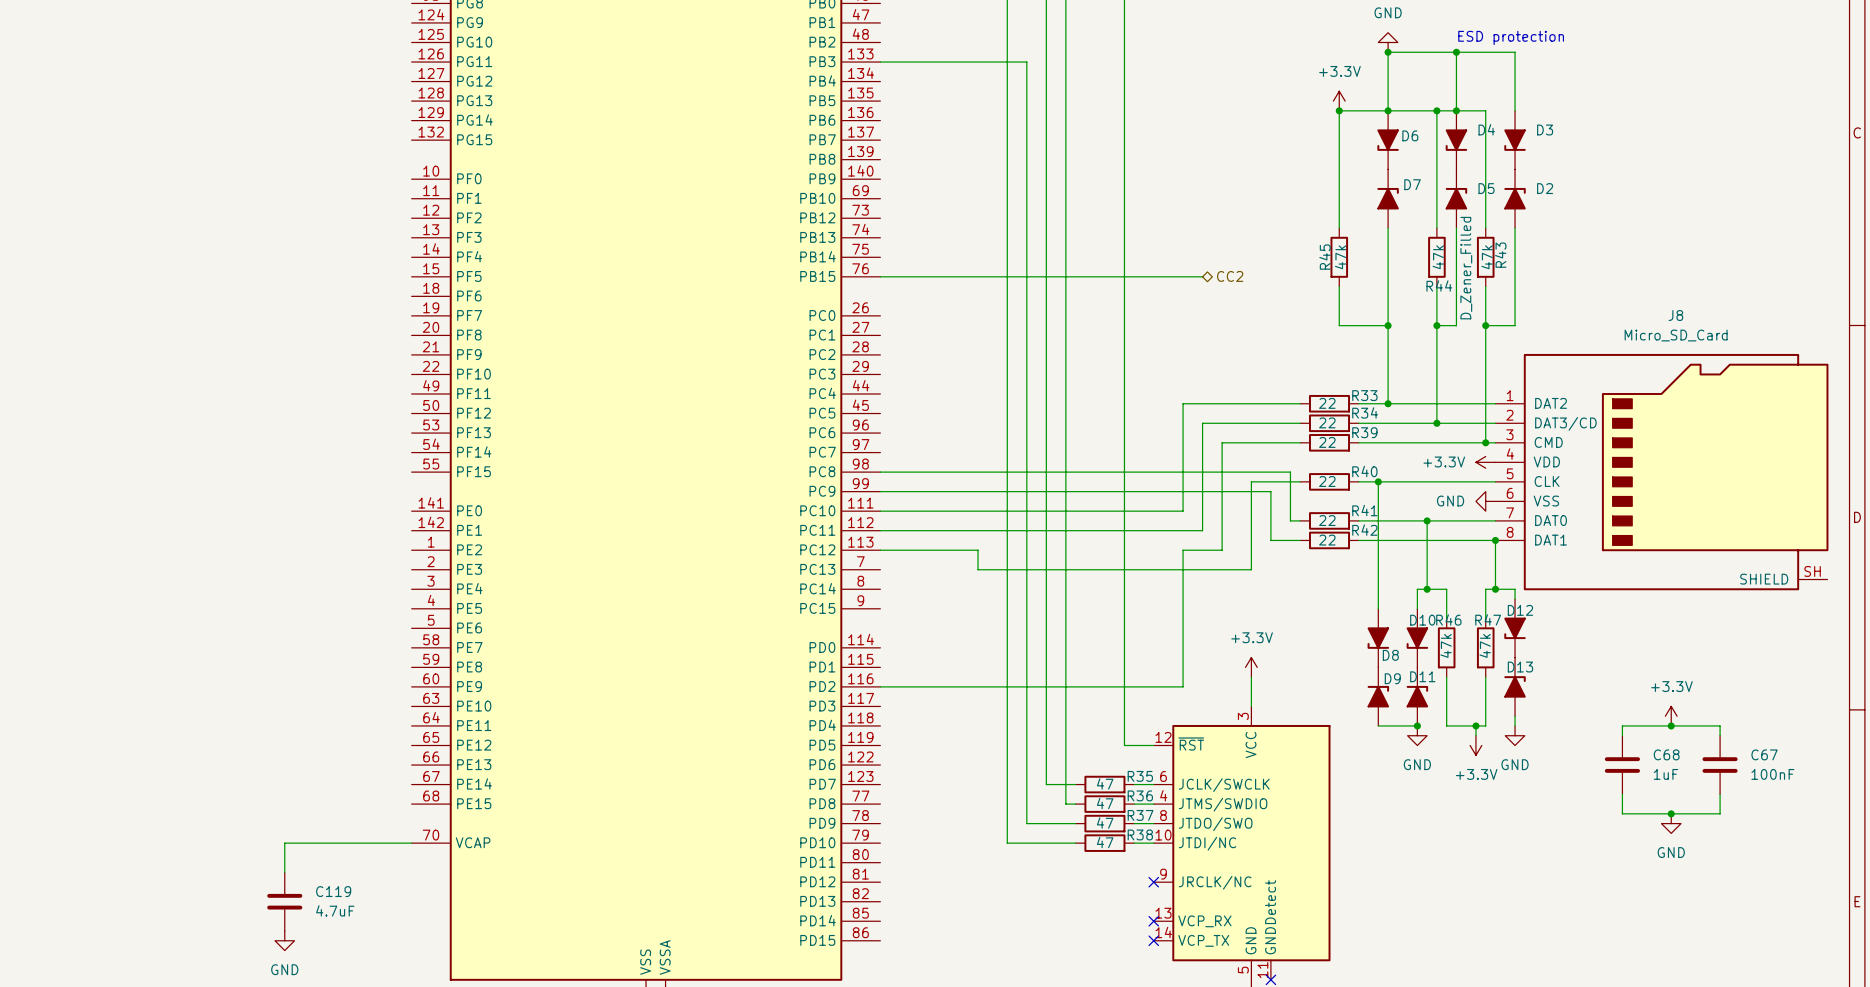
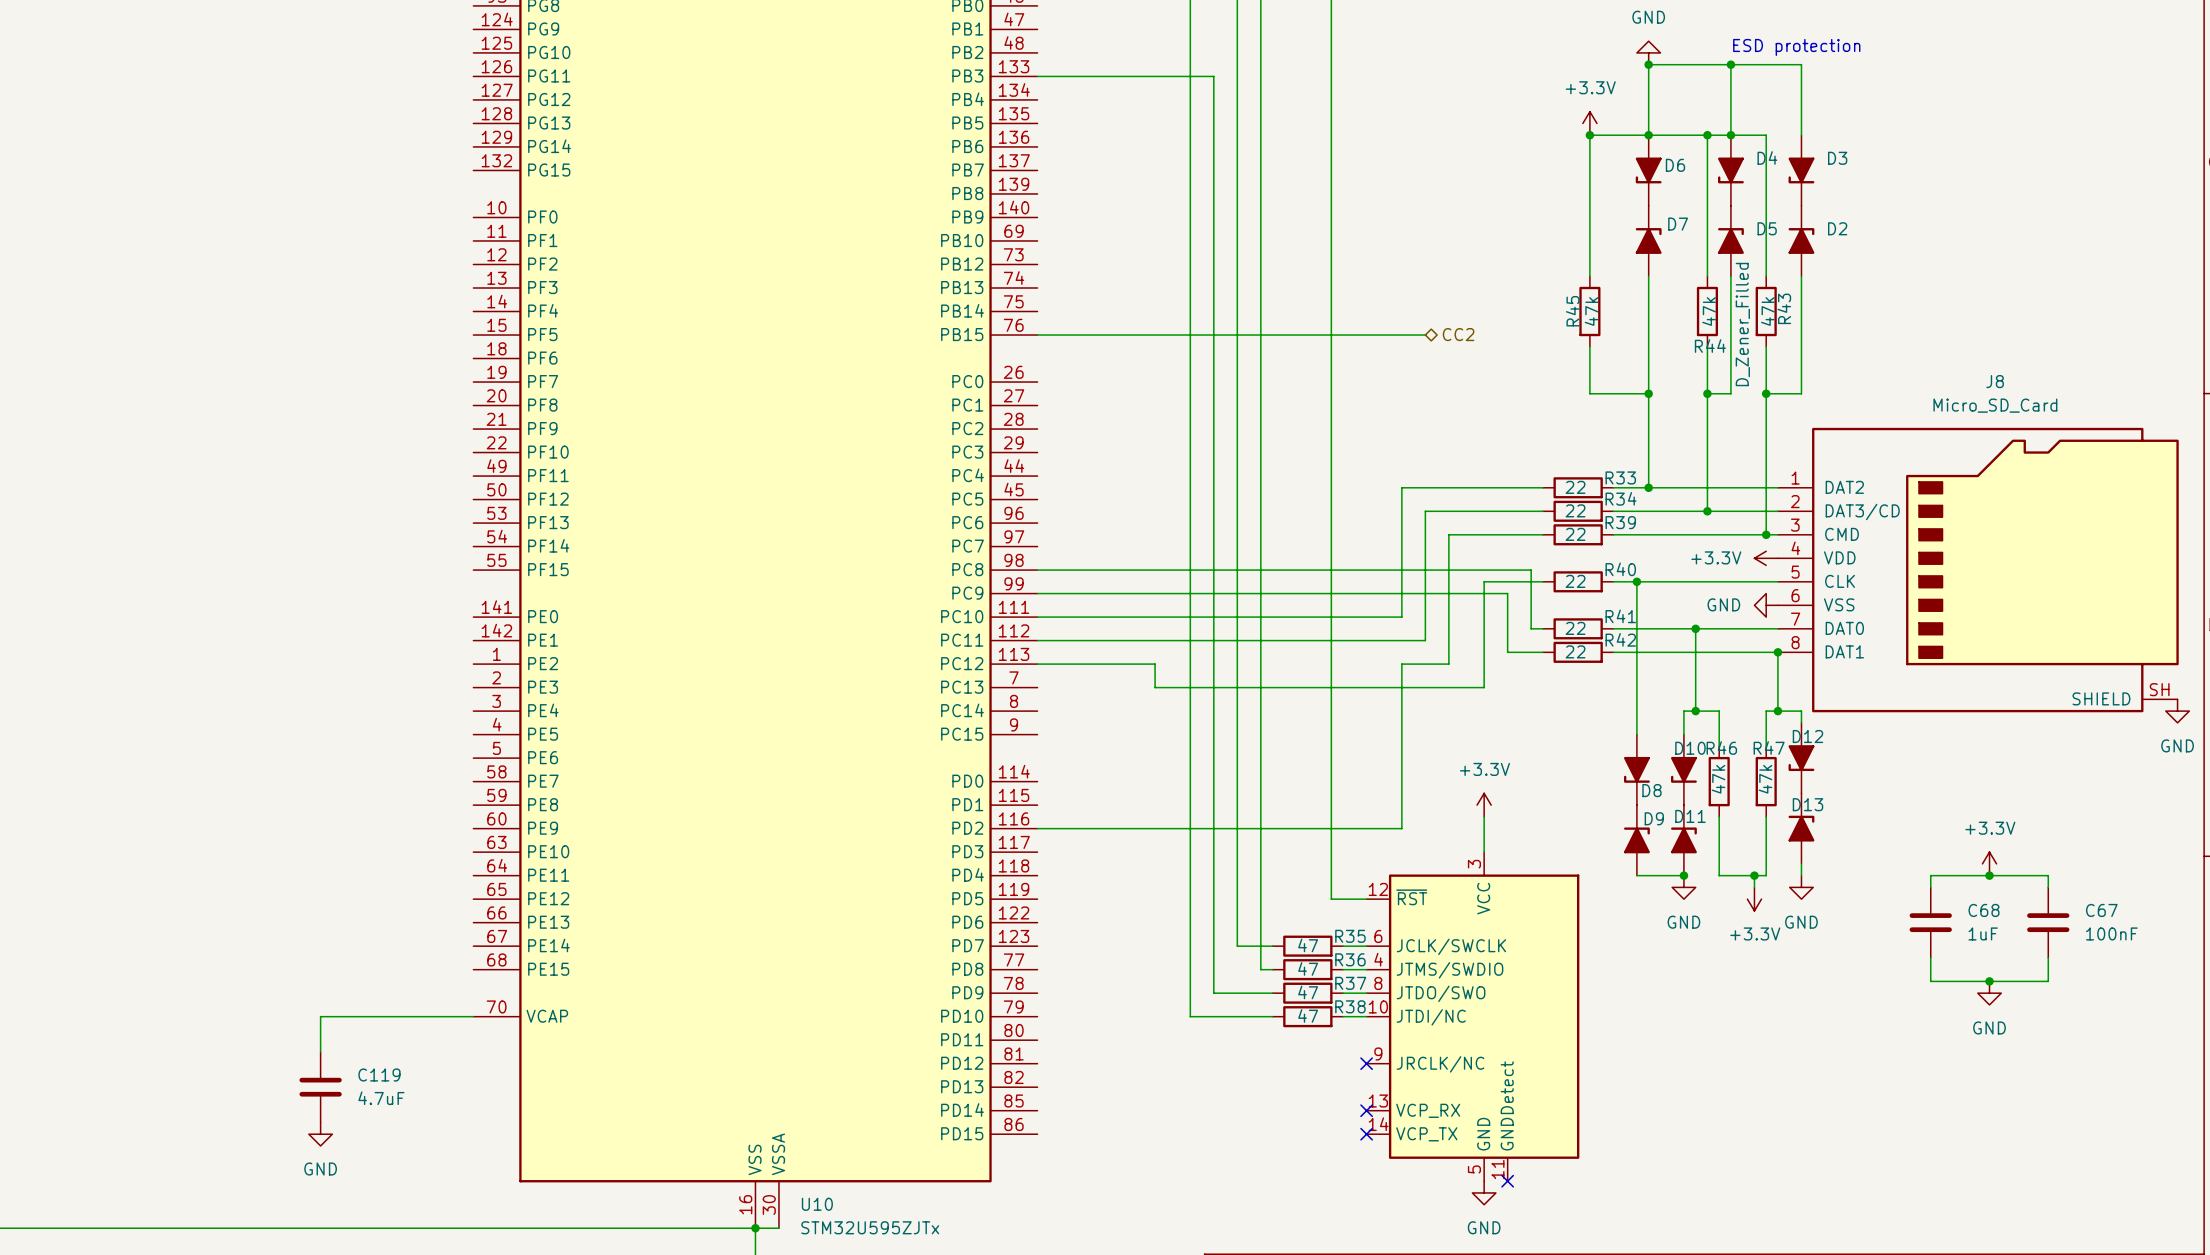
power symbol: none -> GND (2177, 711)

